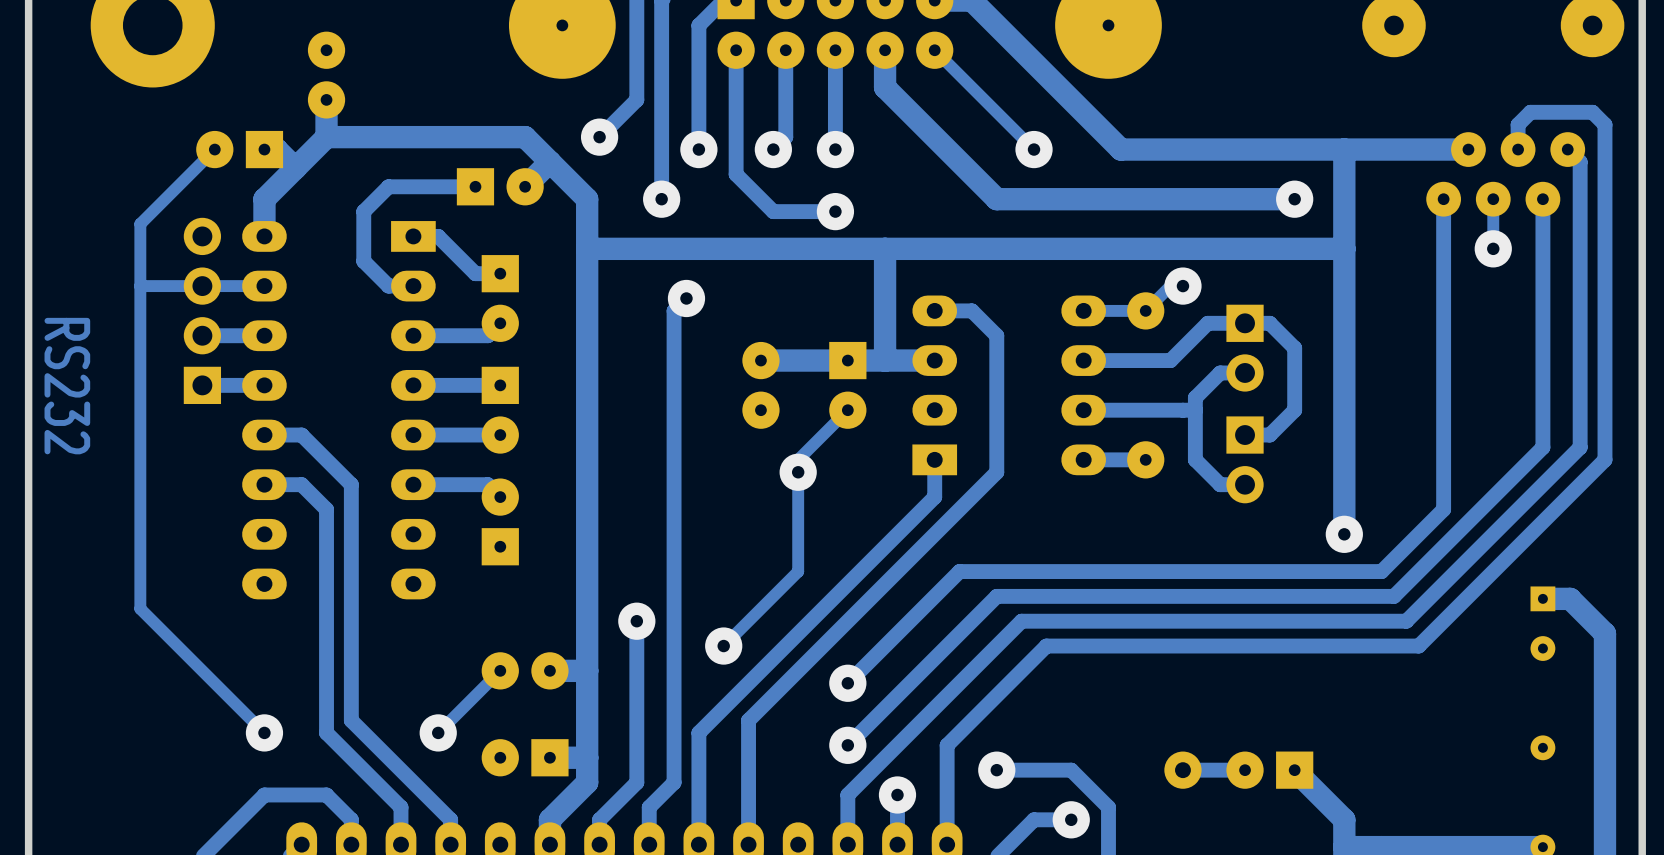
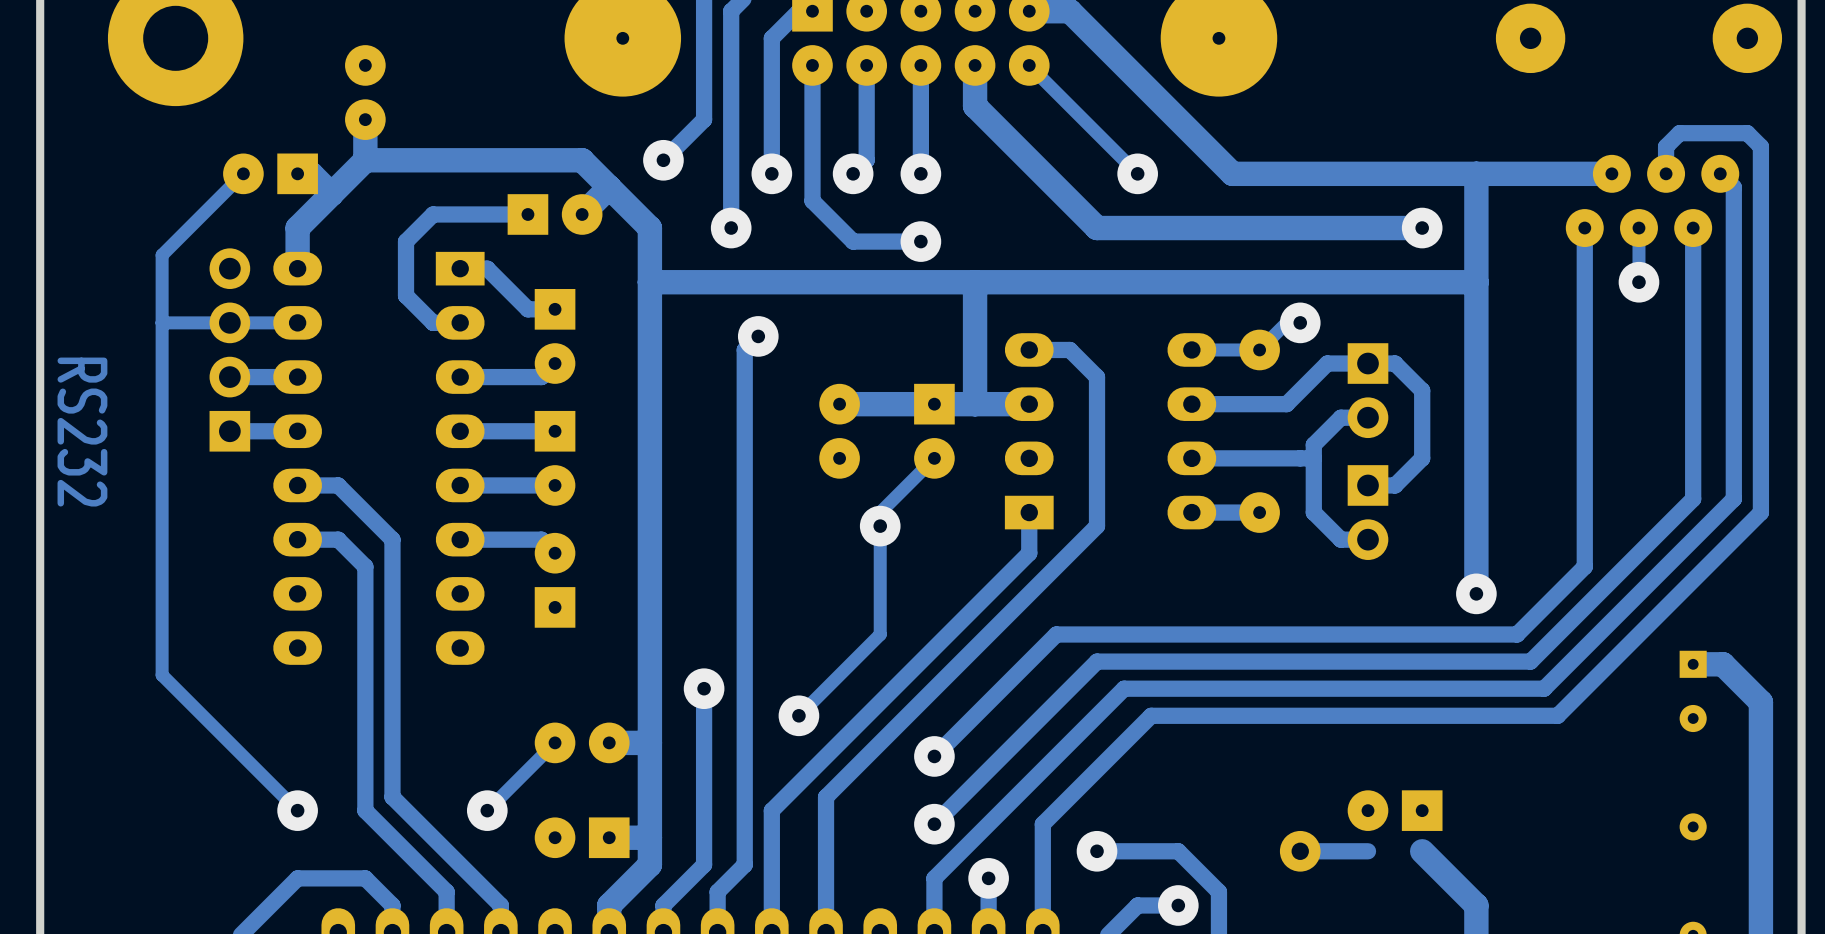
part position: (1269, 770) -> (1395, 810)

